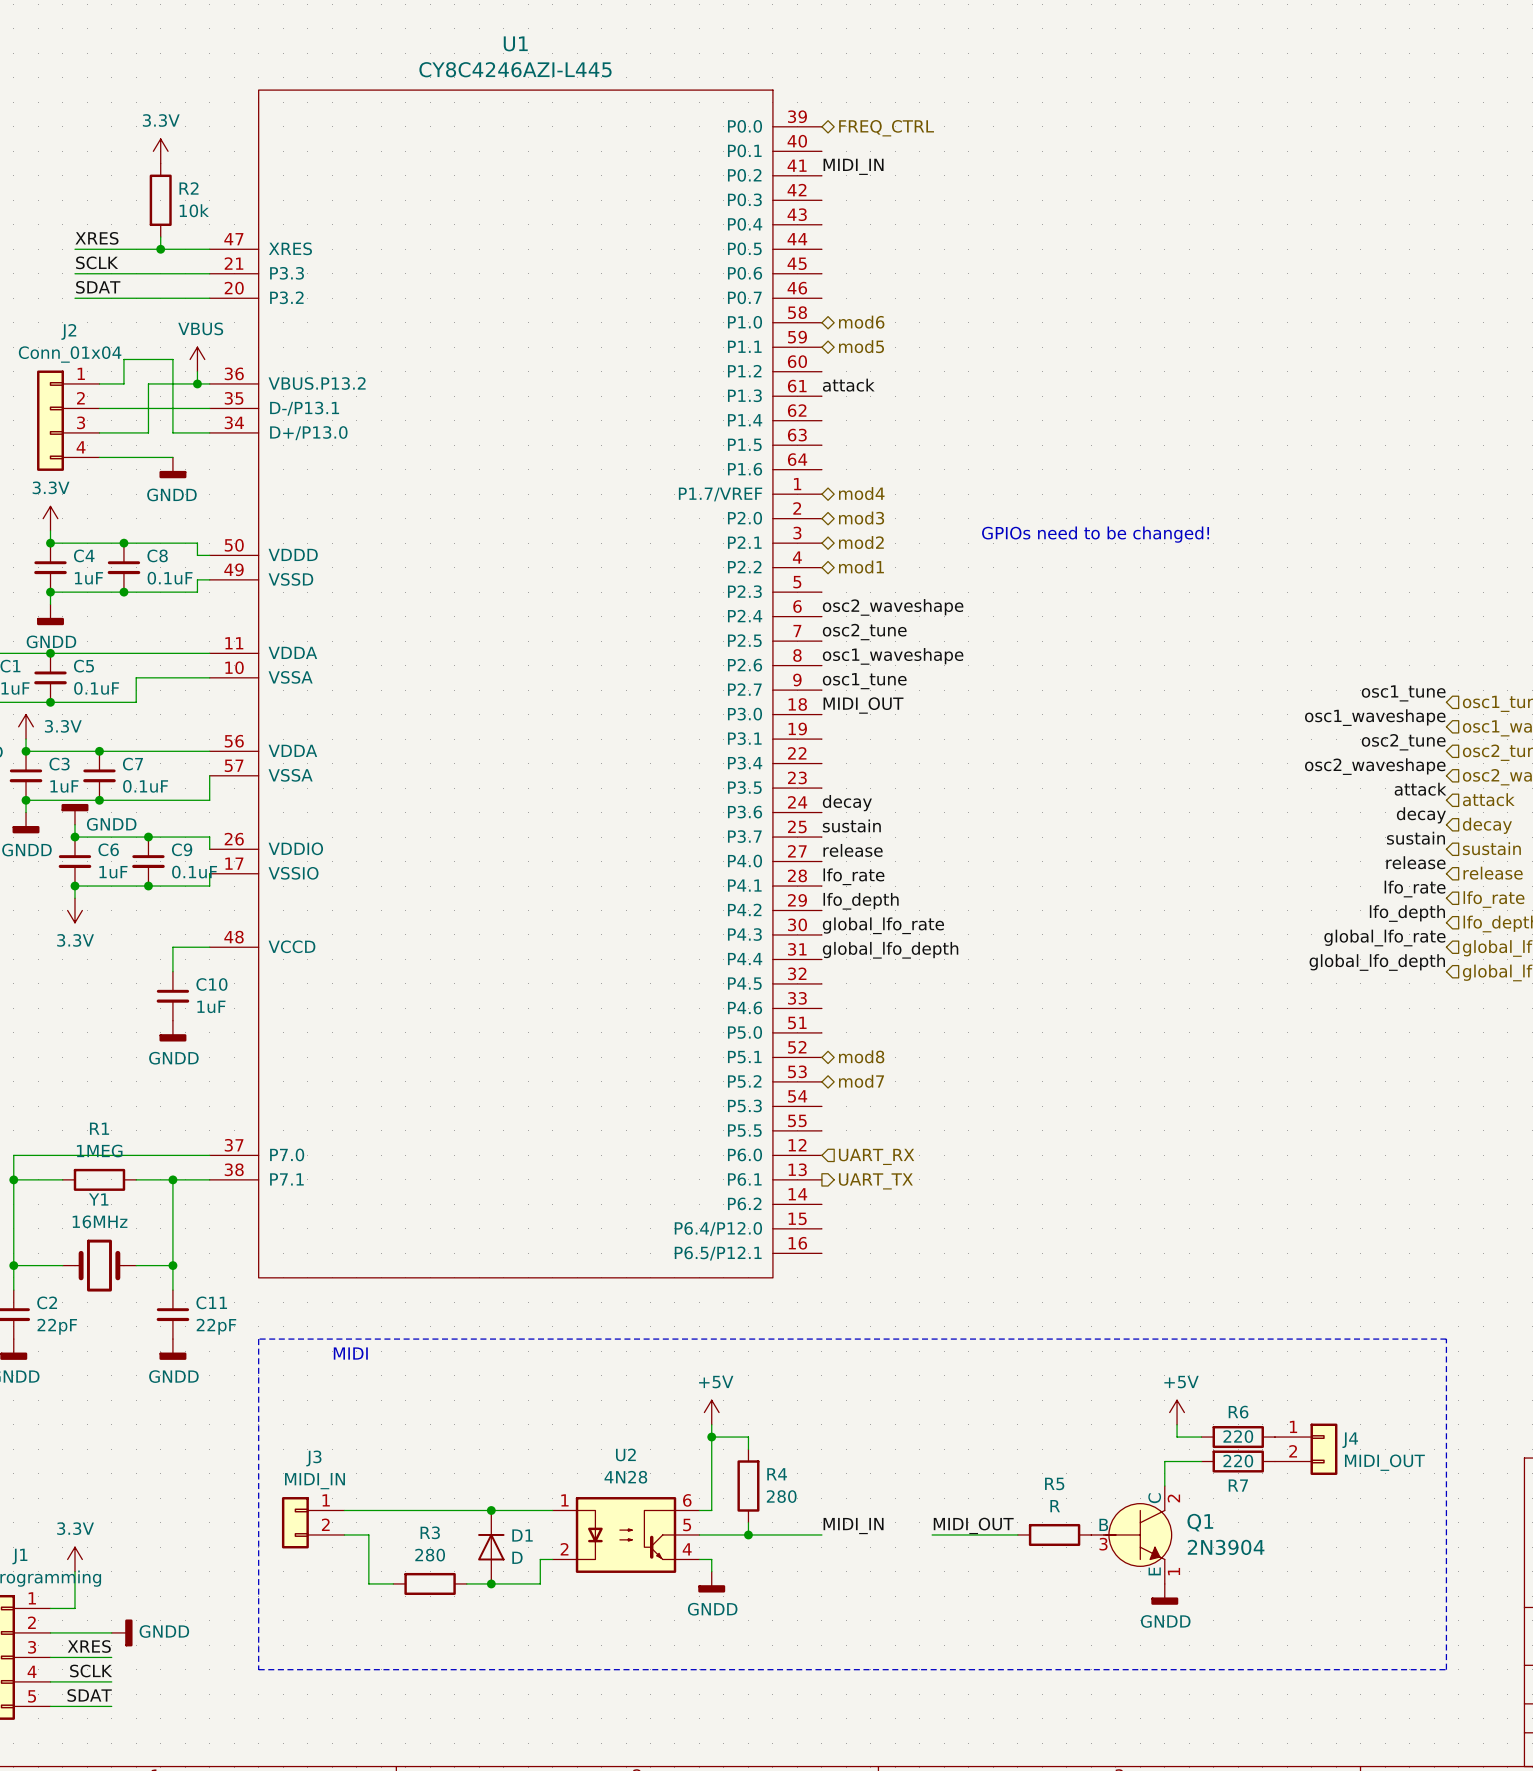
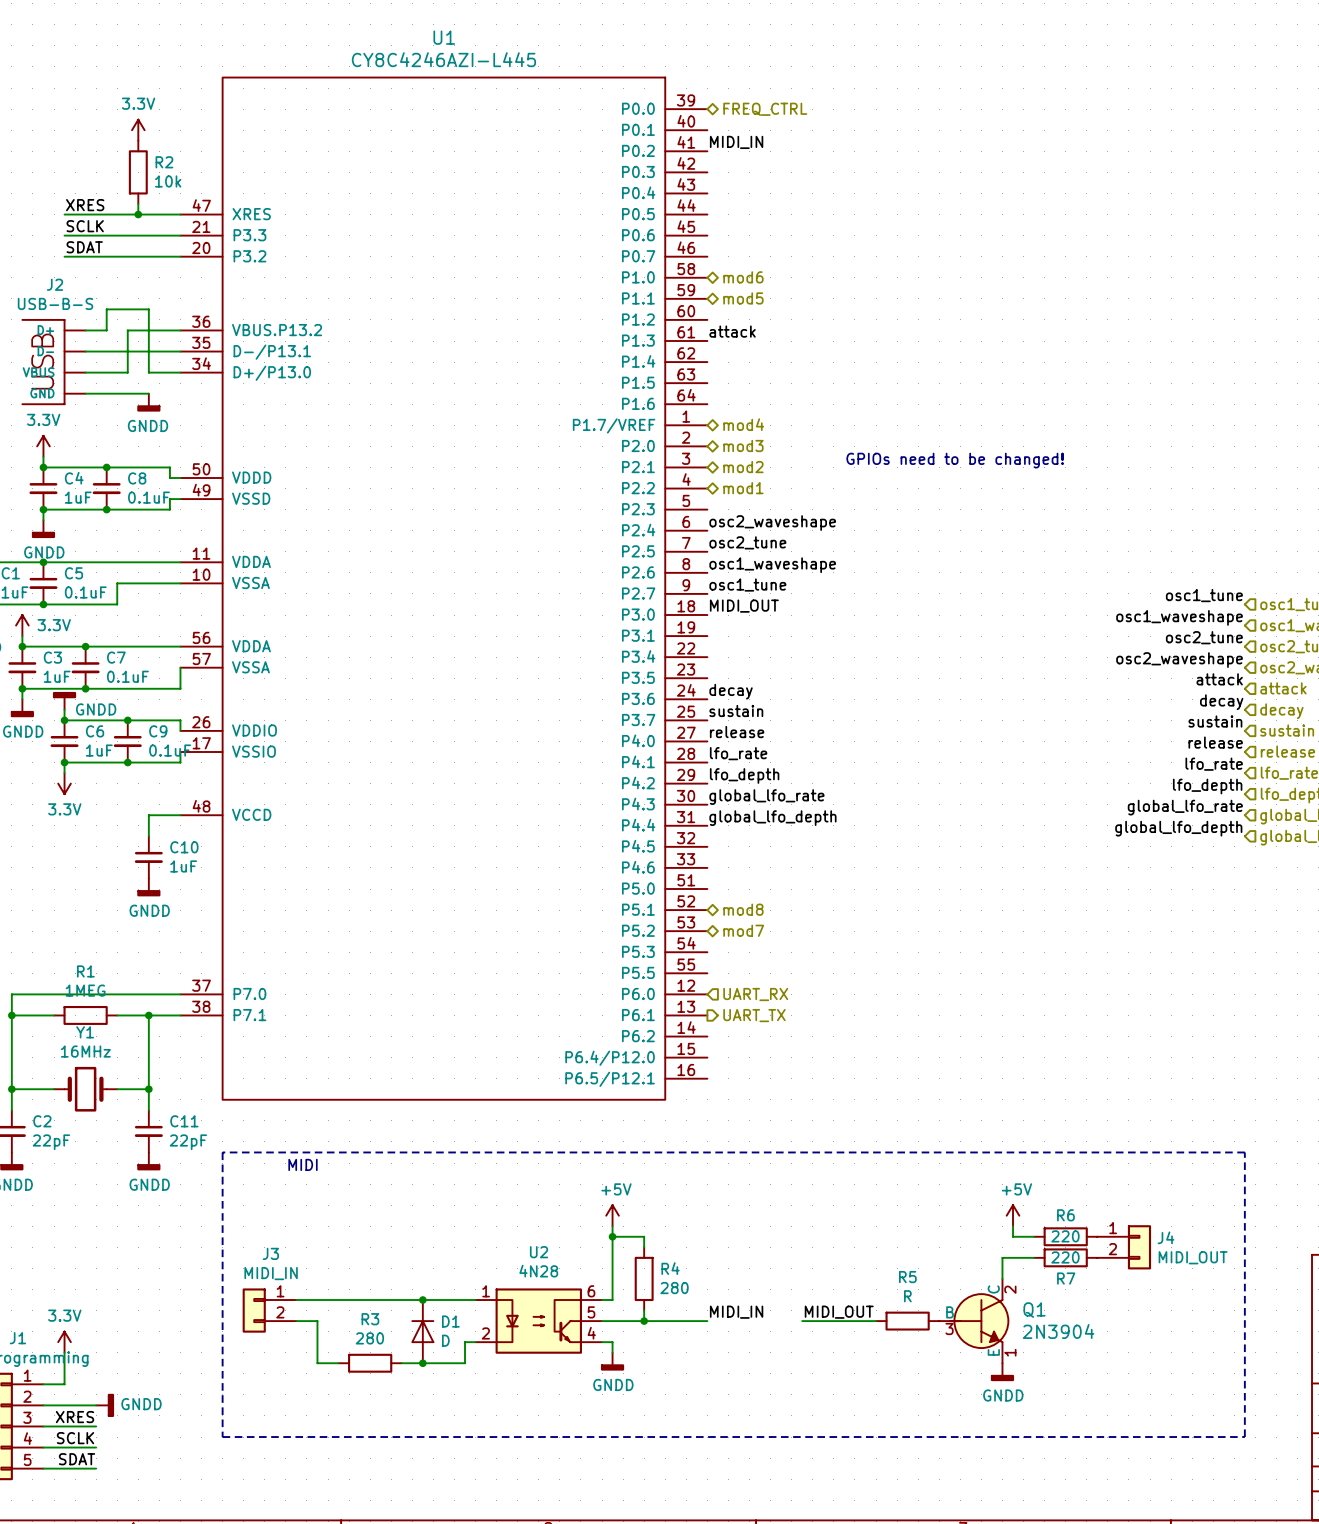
J2 value: Conn_01x04 (70, 354) -> USB-B-S (55, 303)
power symbol: VBUS (197, 359) -> none
J2 symbol: [37, 370, 100, 471] -> [22, 319, 86, 405]
wire: (197, 371) (197, 383) -> none
junction: (197, 383) -> none

